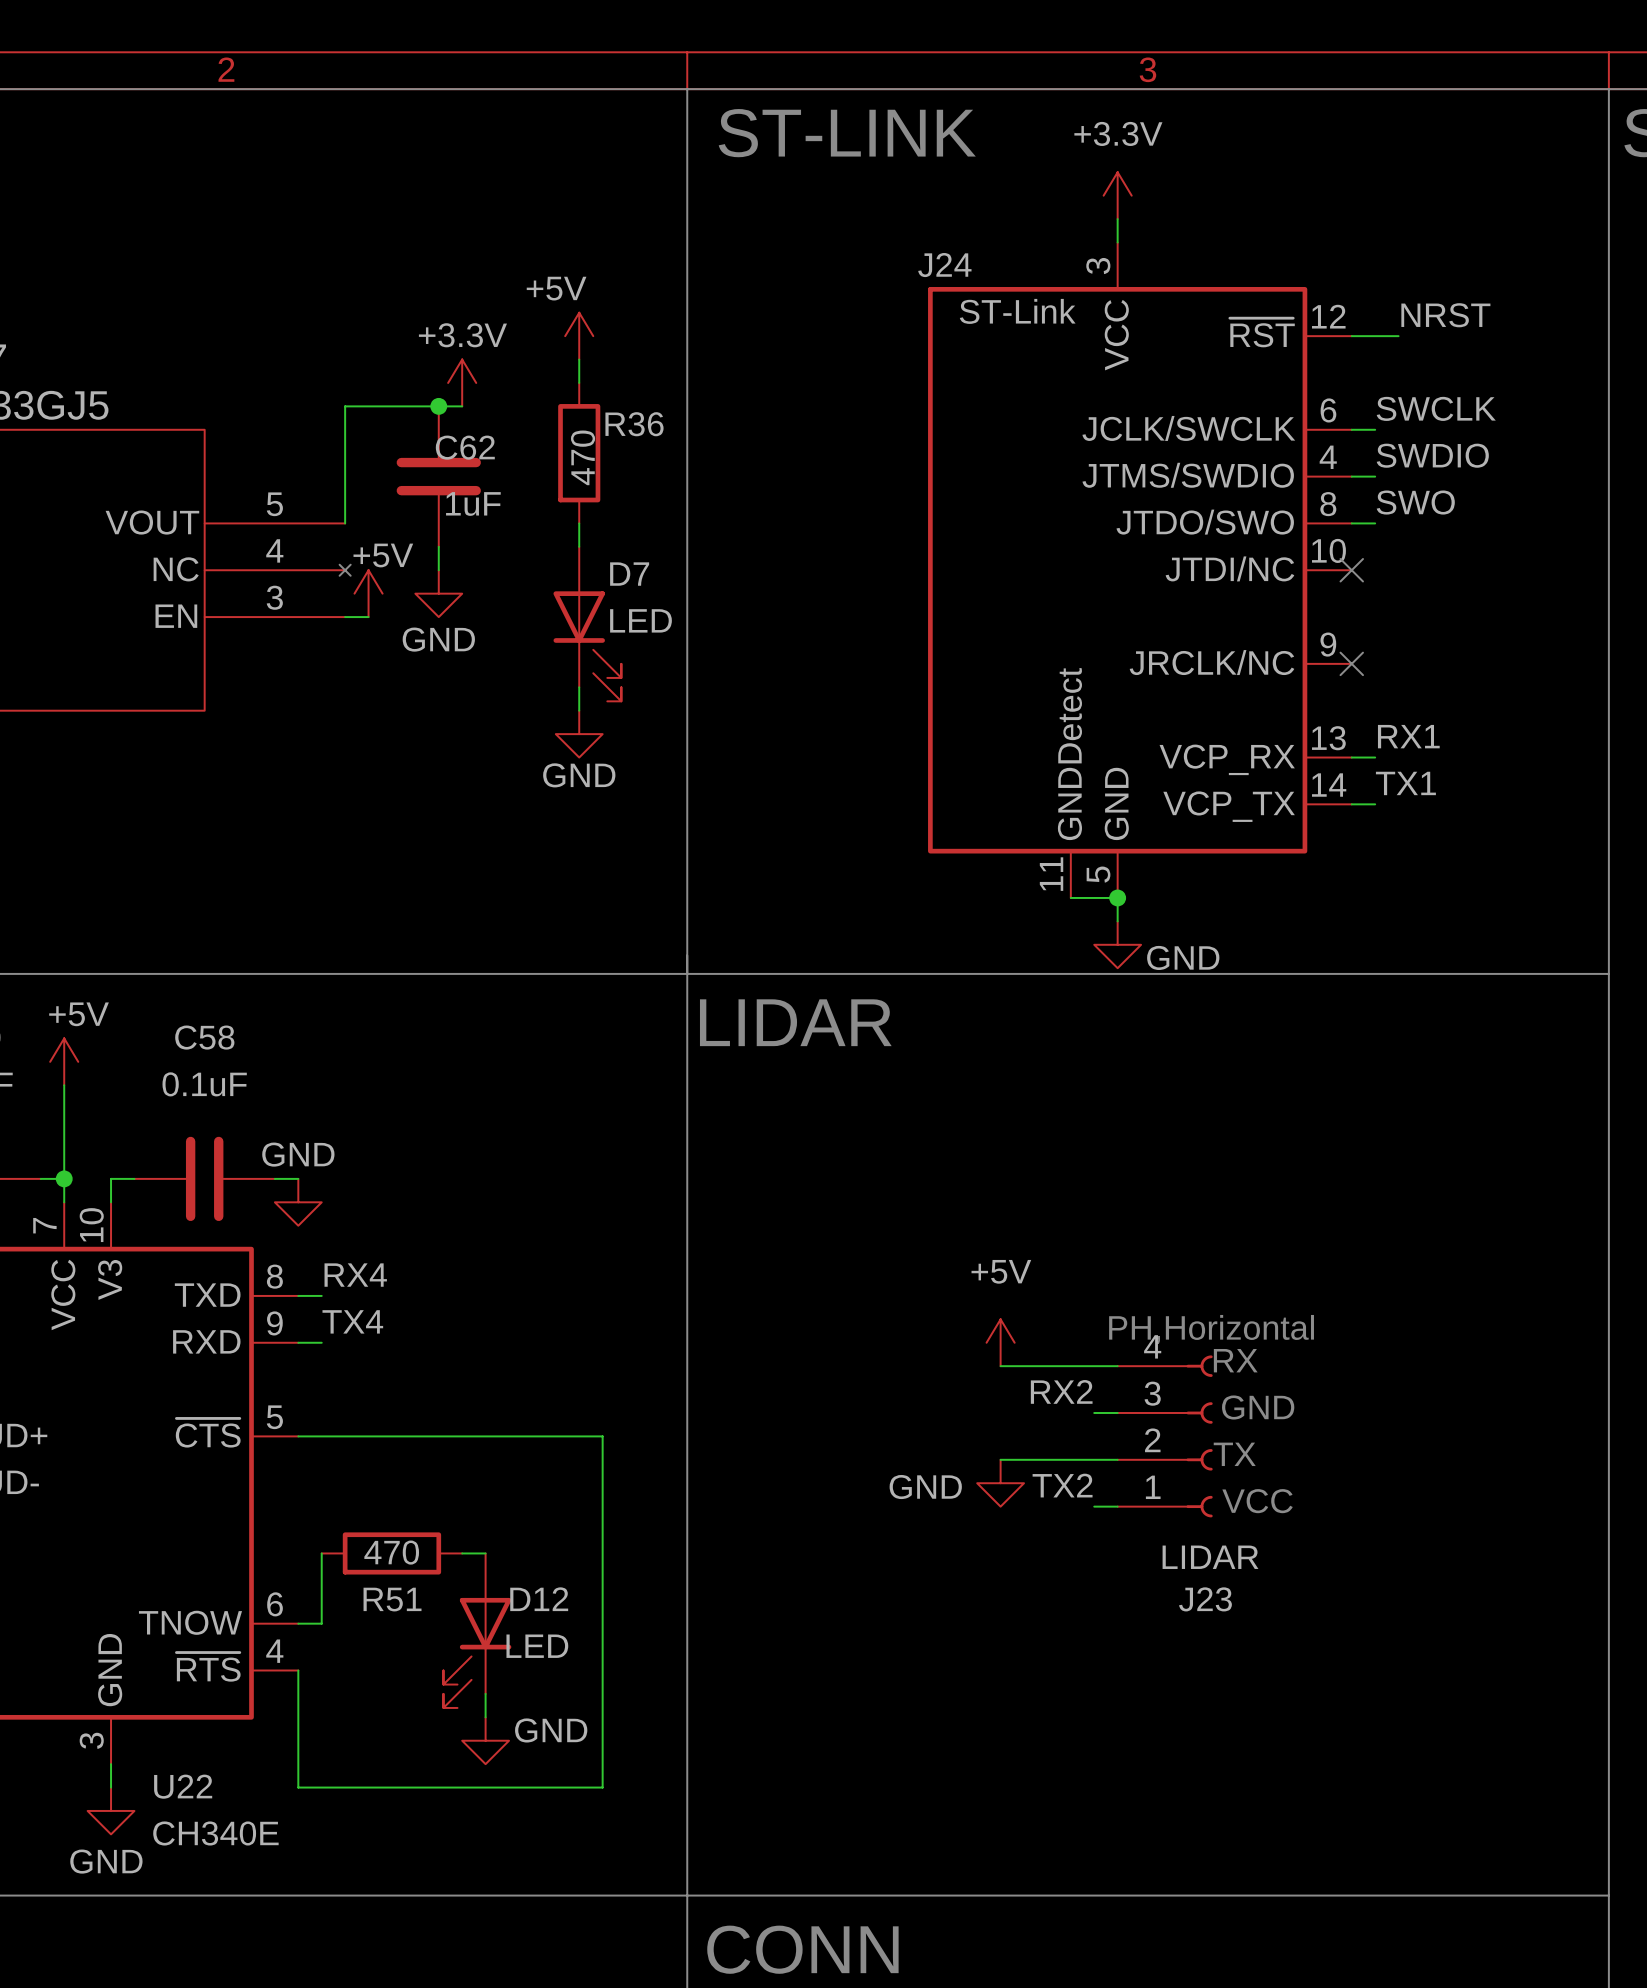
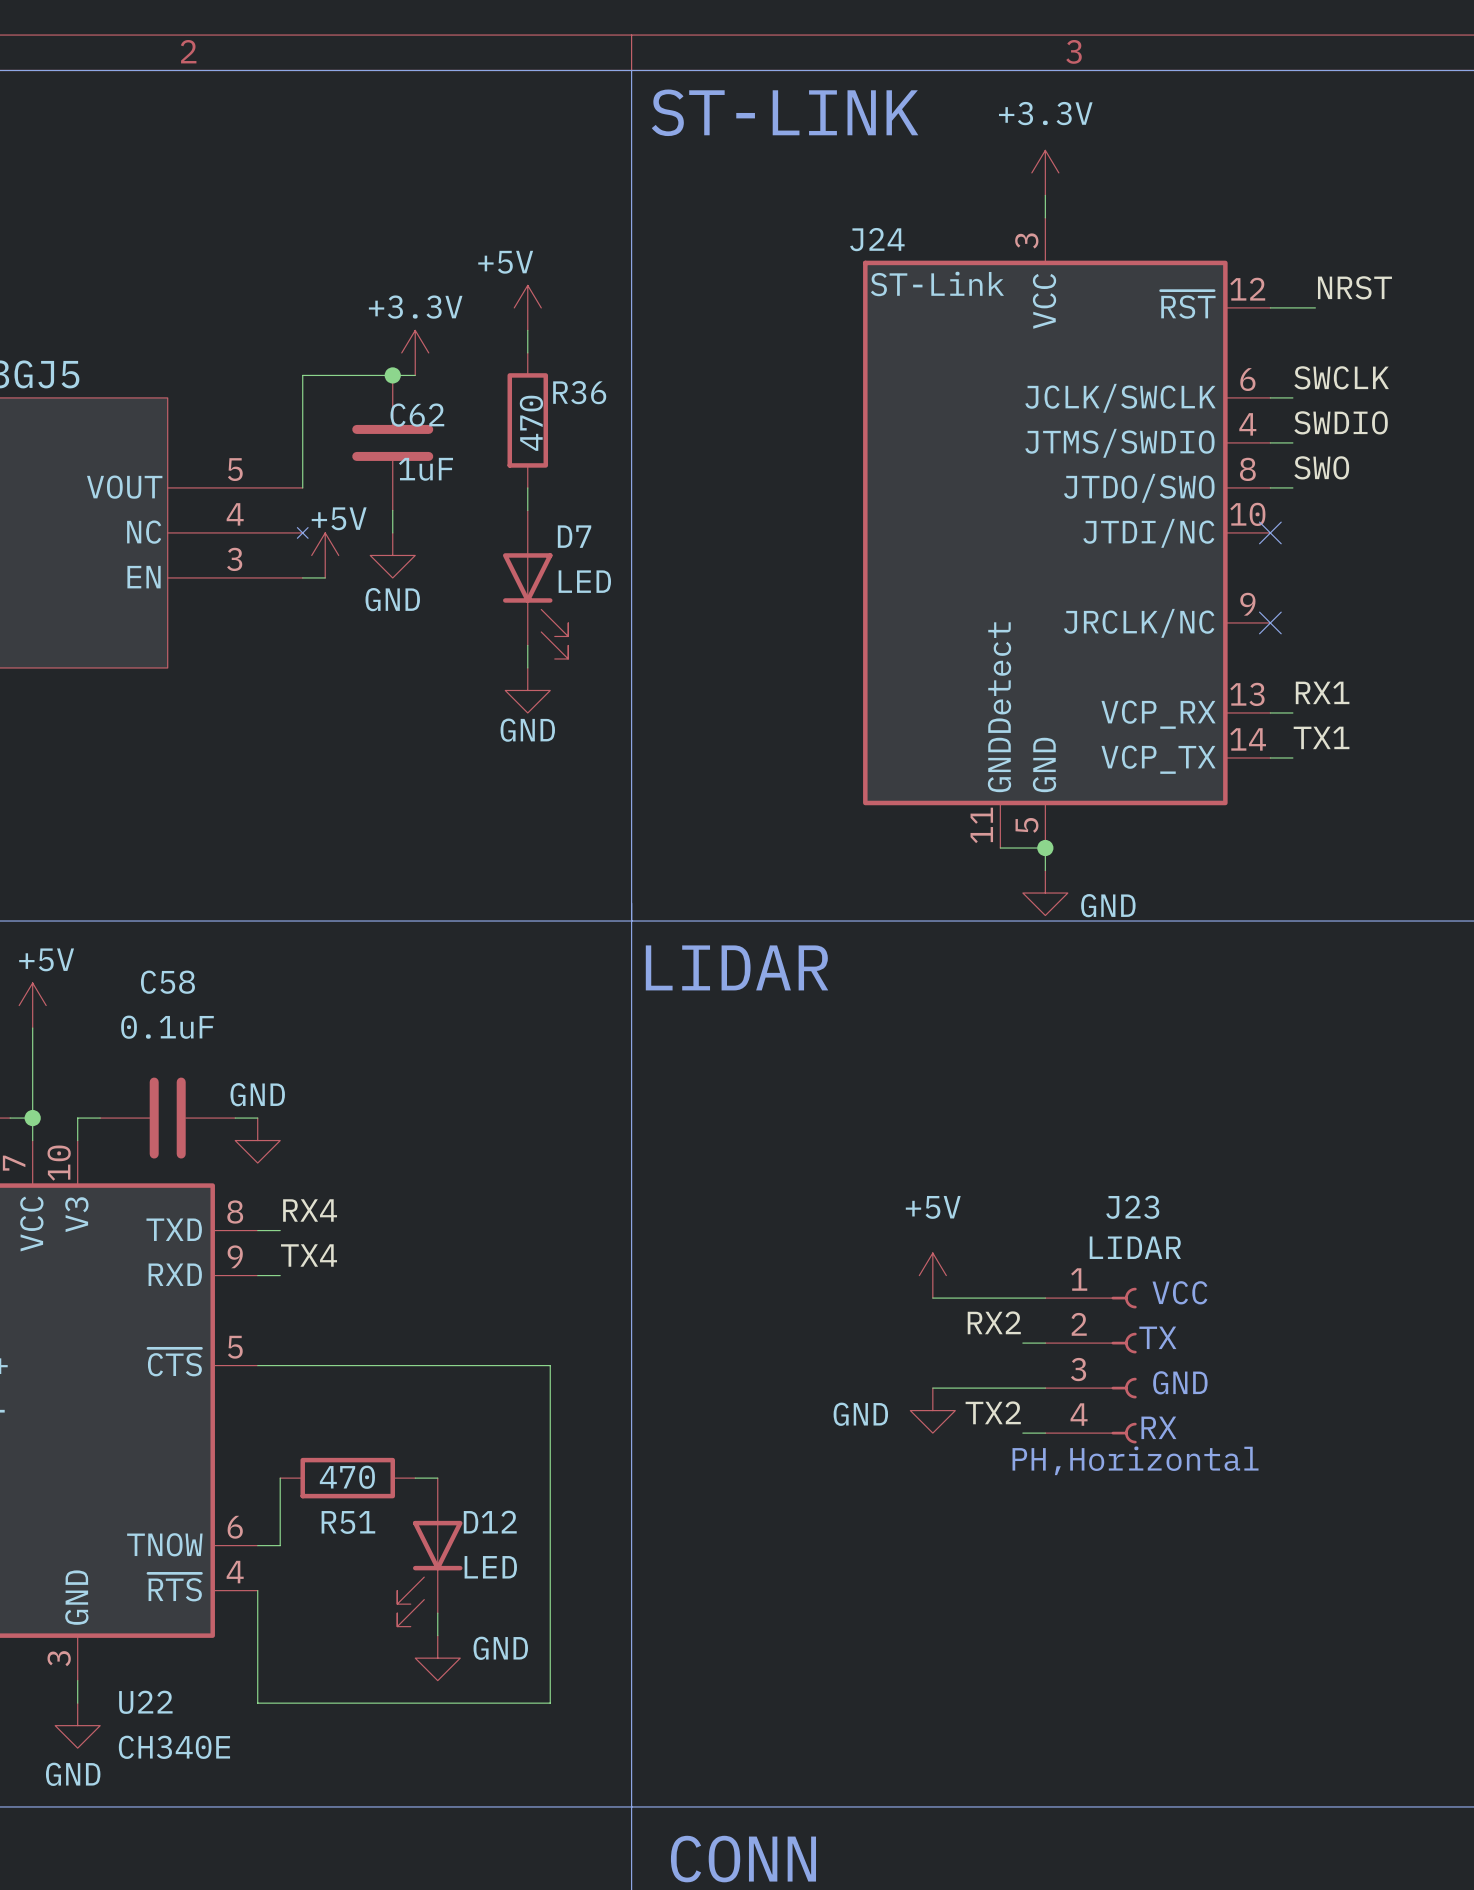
text position: PH,Horizontal (1211, 1329) -> PH,Horizontal (1135, 1460)
text position: RX (1235, 1360) -> RX (1158, 1427)
text position: GND (1258, 1407) -> GND (1180, 1382)
J23 flip: as is (1199, 1436) -> up-down (1124, 1365)
text position: TX (1234, 1454) -> TX (1157, 1337)
text position: VCC (1257, 1501) -> VCC (1179, 1292)

